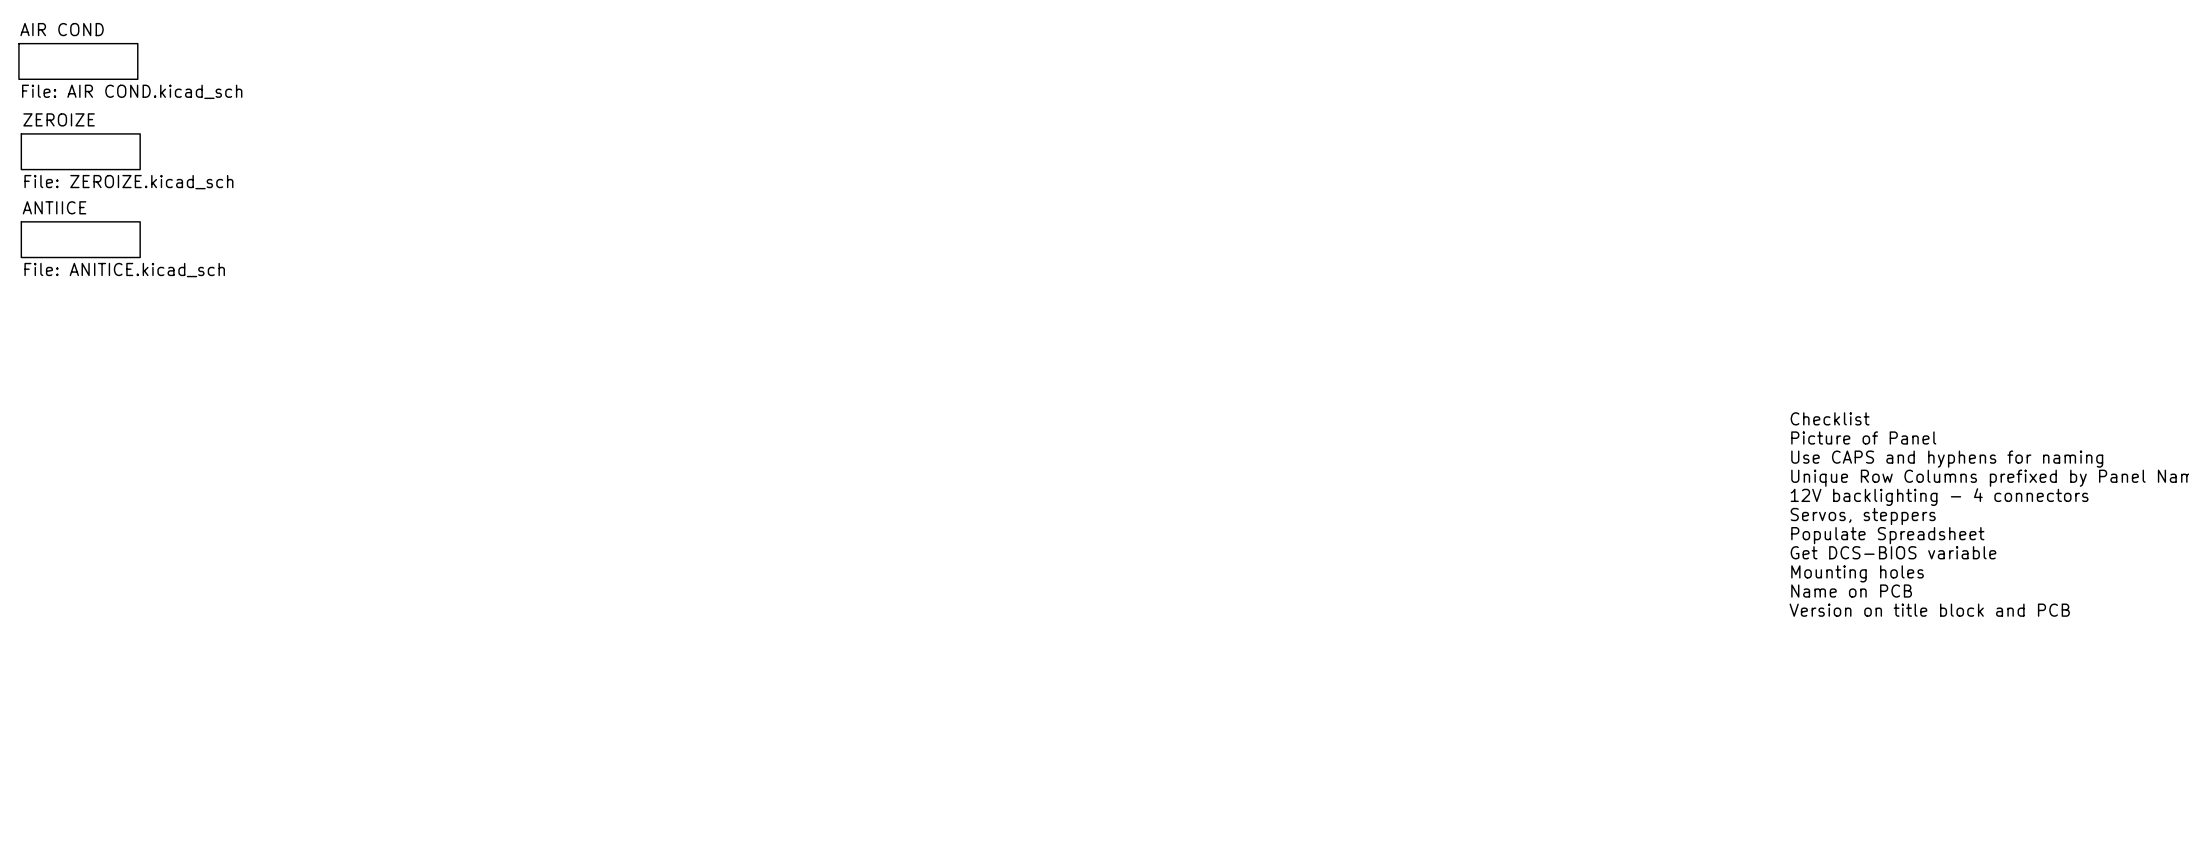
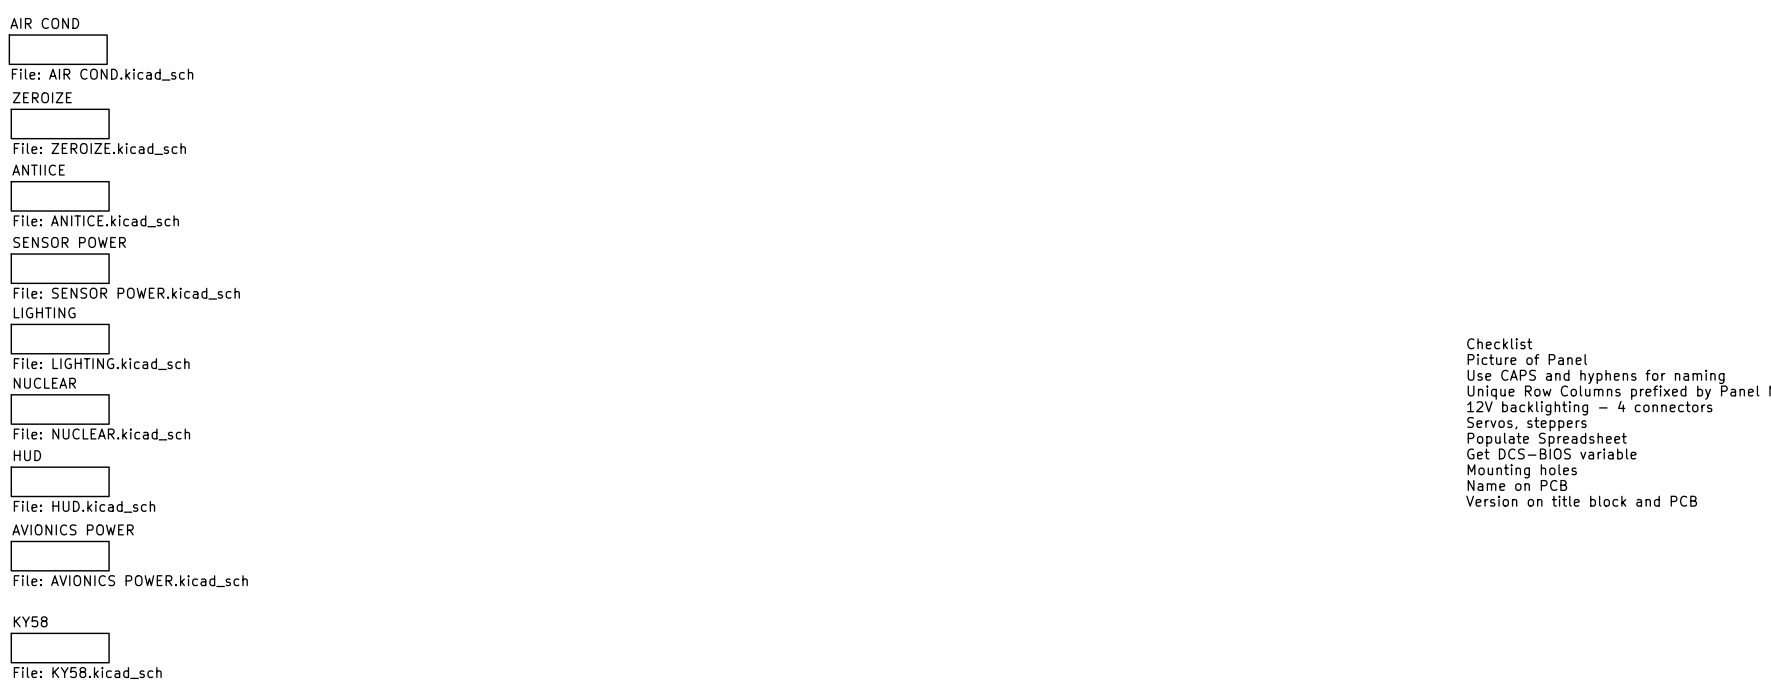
sheet SENSOR POWER: none -> File: SENSOR POWER.kicad_sch (60, 268)
sheet LIGHTING: none -> File: LIGHTING.kicad_sch (60, 339)
sheet NUCLEAR: none -> File: NUCLEAR.kicad_sch (60, 409)
sheet HUD: none -> File: HUD.kicad_sch (60, 481)
sheet AVIONICS POWER: none -> File: AVIONICS POWER.kicad_sch (60, 556)
sheet KY58: none -> File: KY58.kicad_sch (60, 648)

